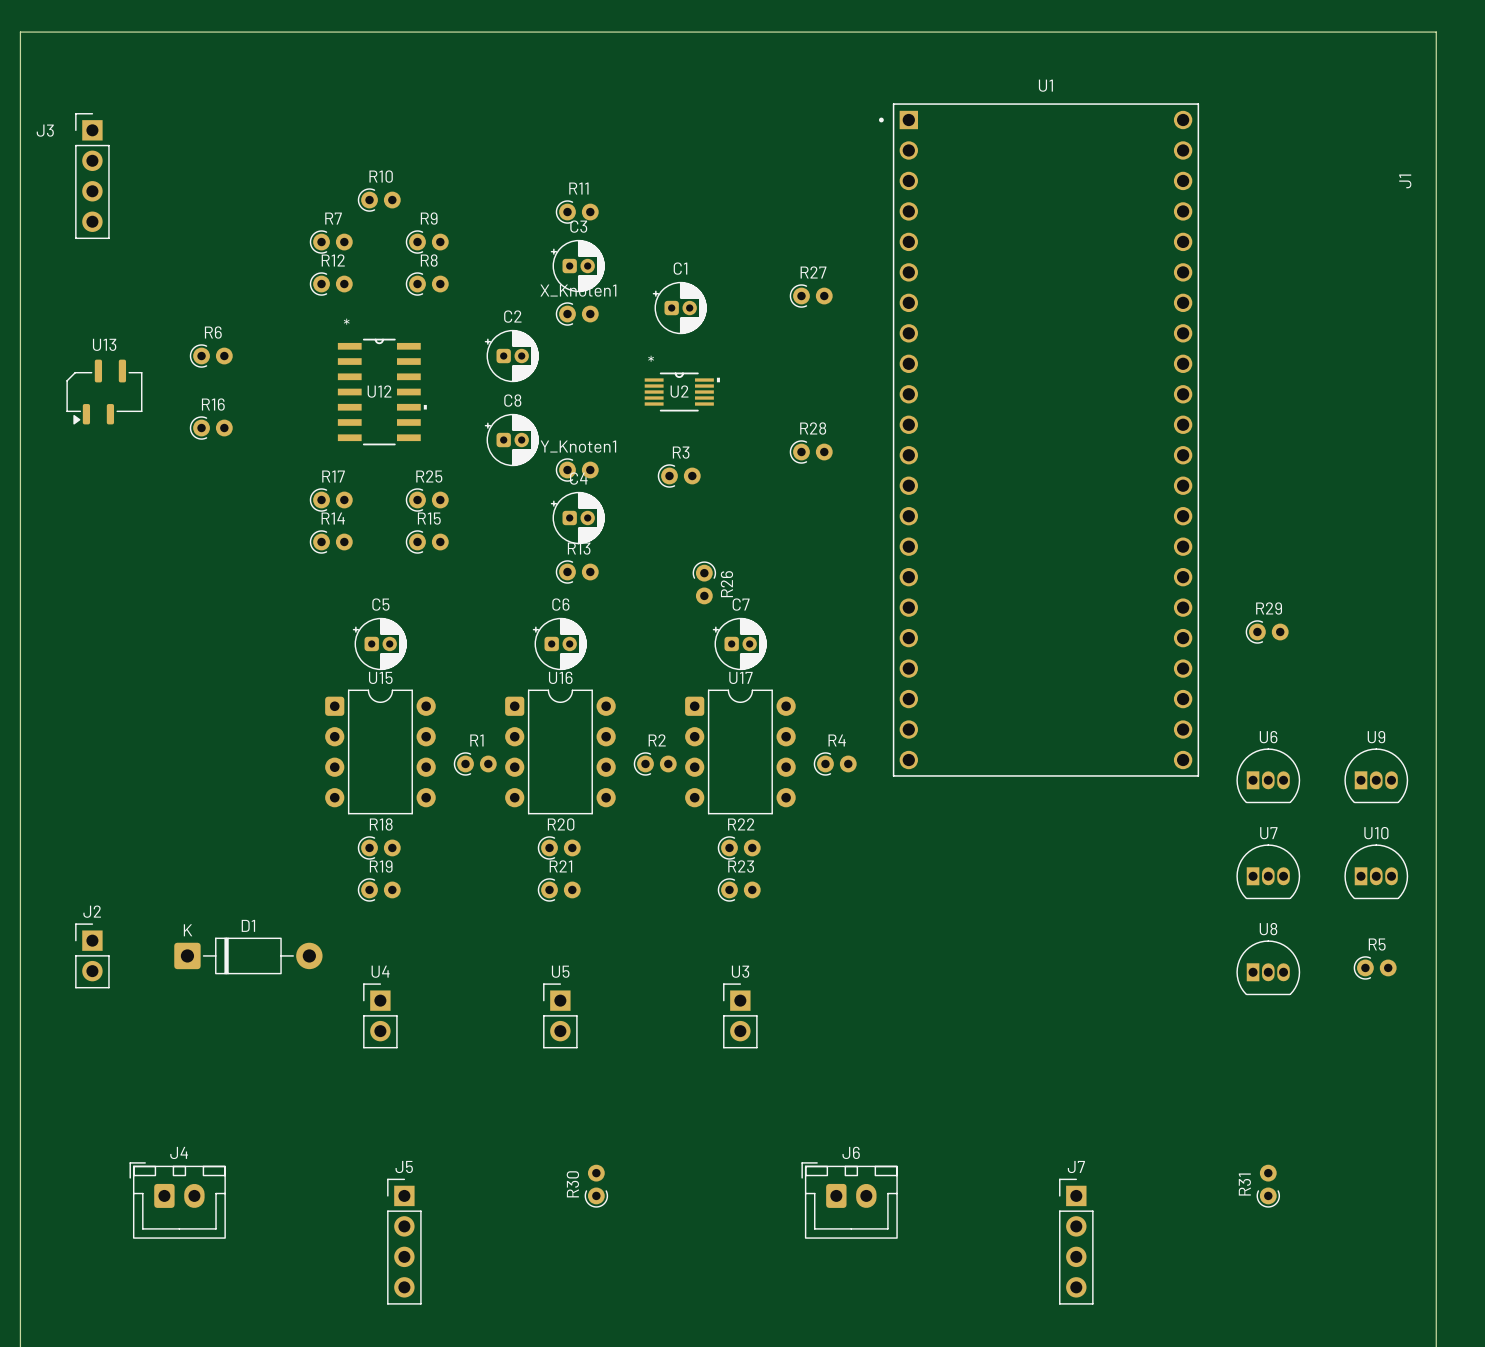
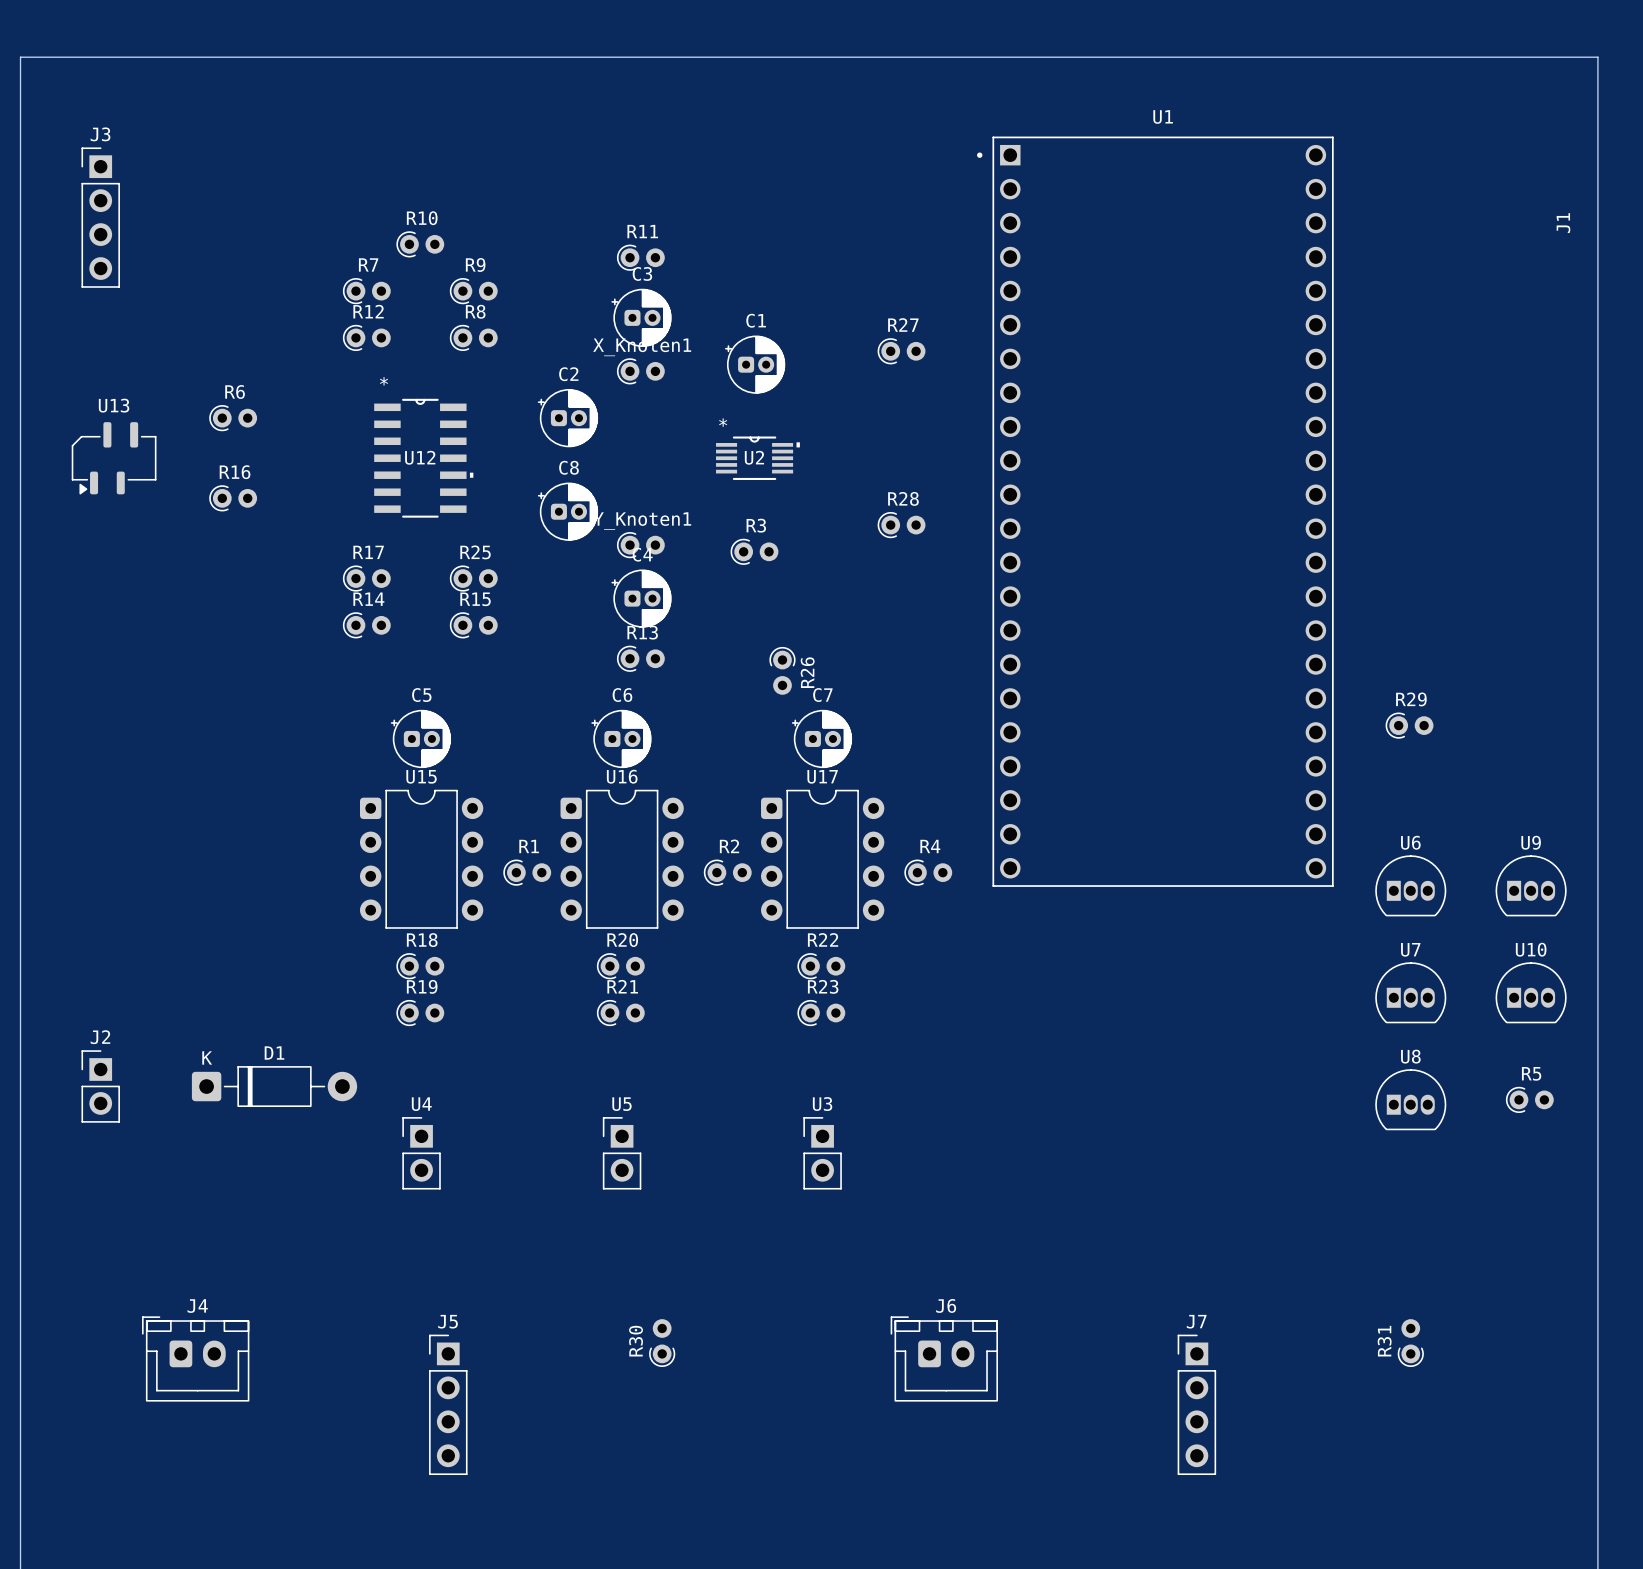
J3 name position: J3 (45, 130) -> J3 (100, 134)

